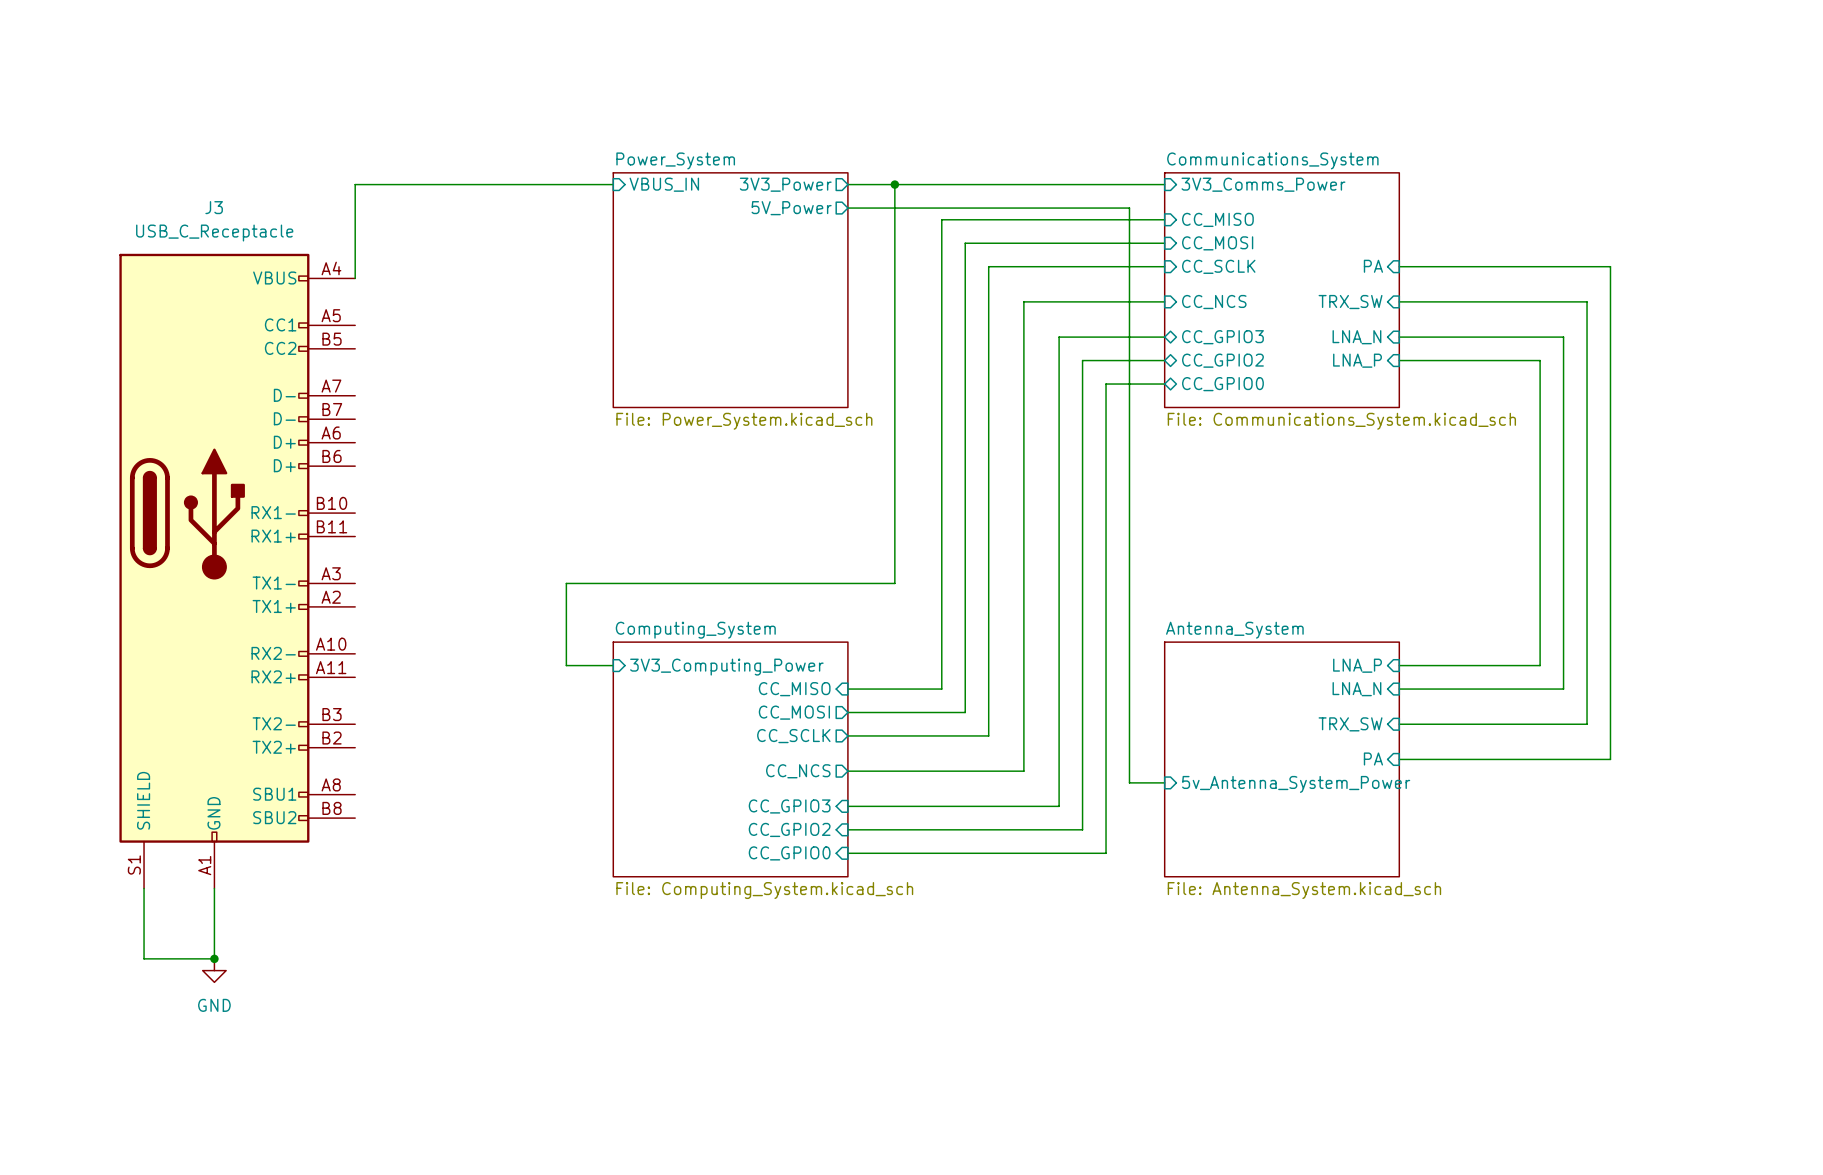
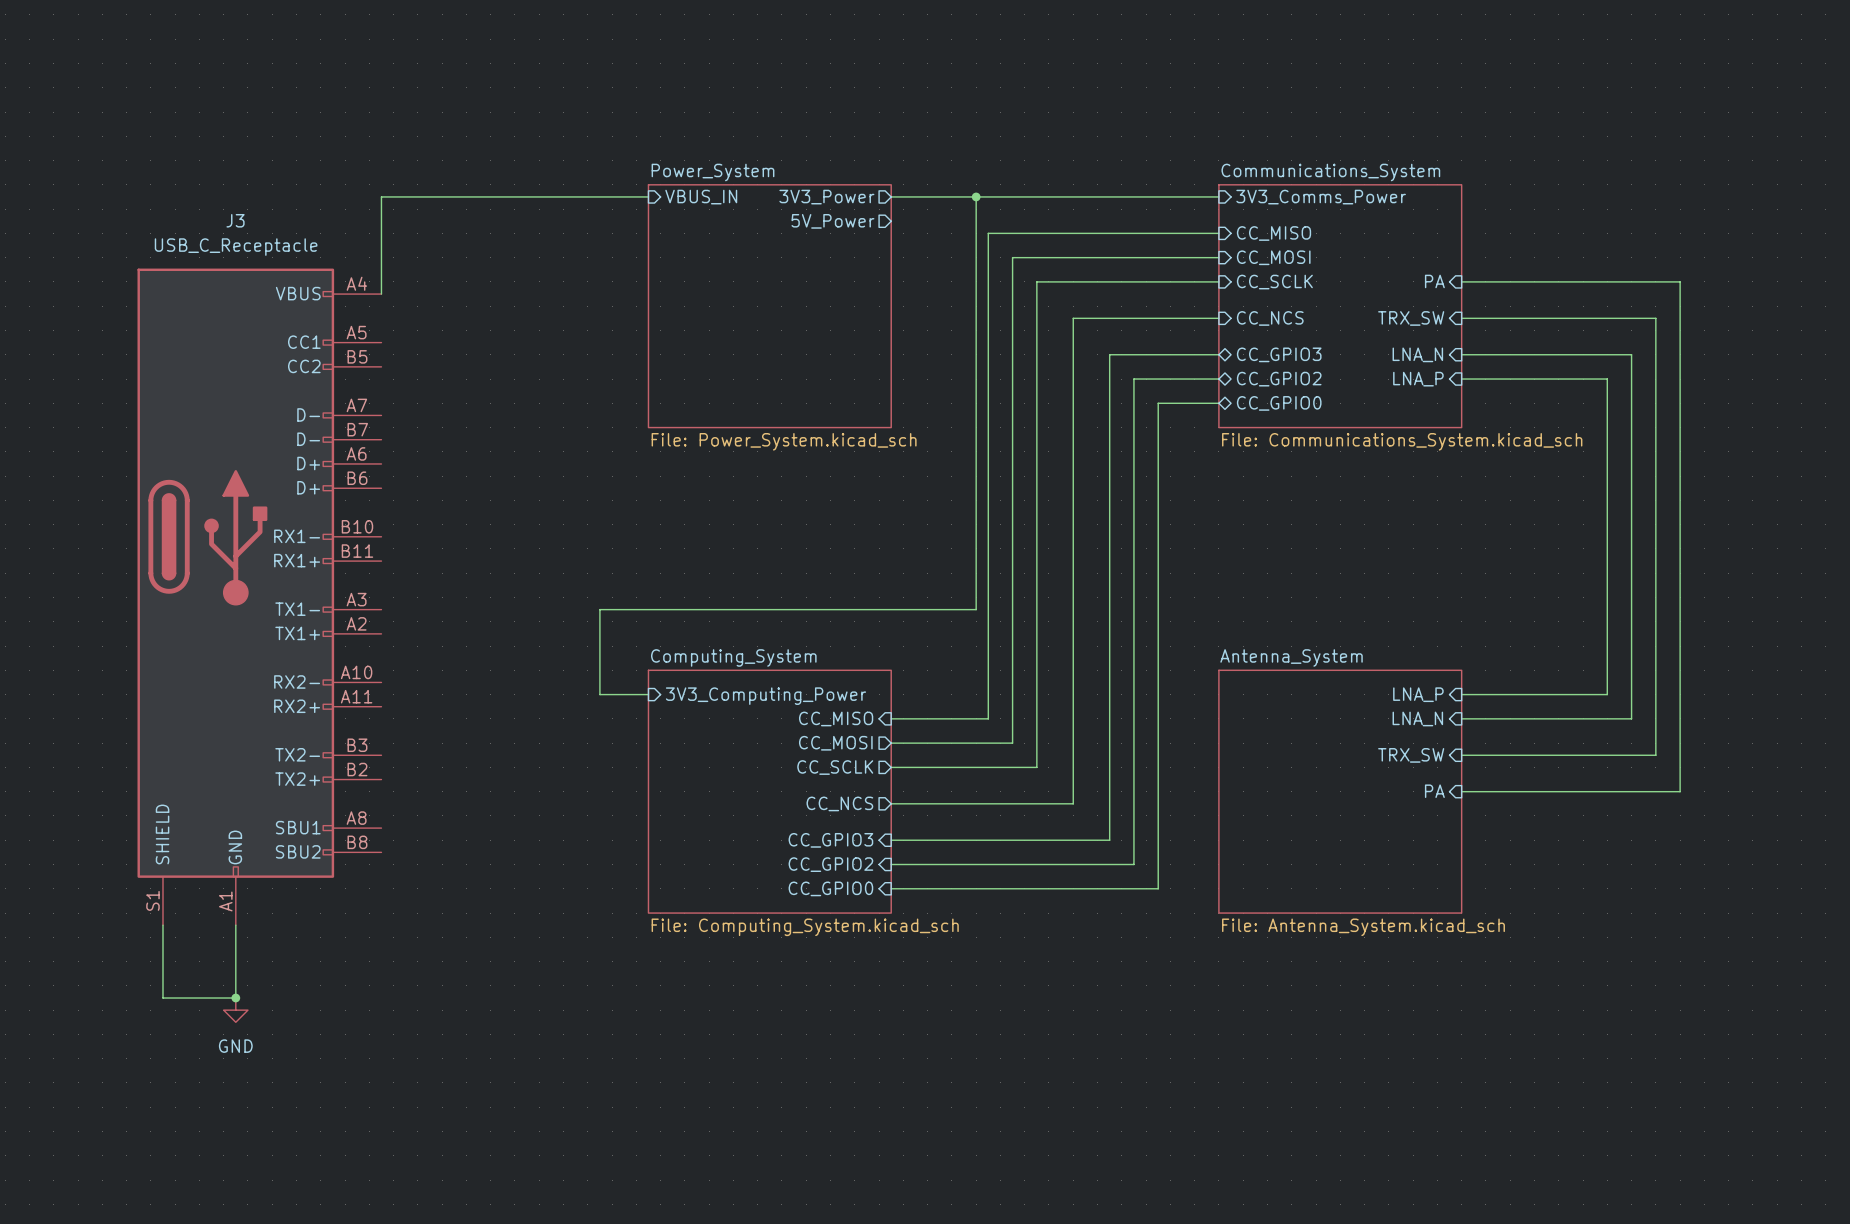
wire: (894, 184) (894, 583) -> (976, 196) (976, 609) (939, 609)
junction position: (894, 184) -> (976, 196)
wire: (847, 208) (1129, 208) (1129, 782) (1164, 782) -> none
sheet pin: 5v_Antenna_System_Power (1296, 784) -> none

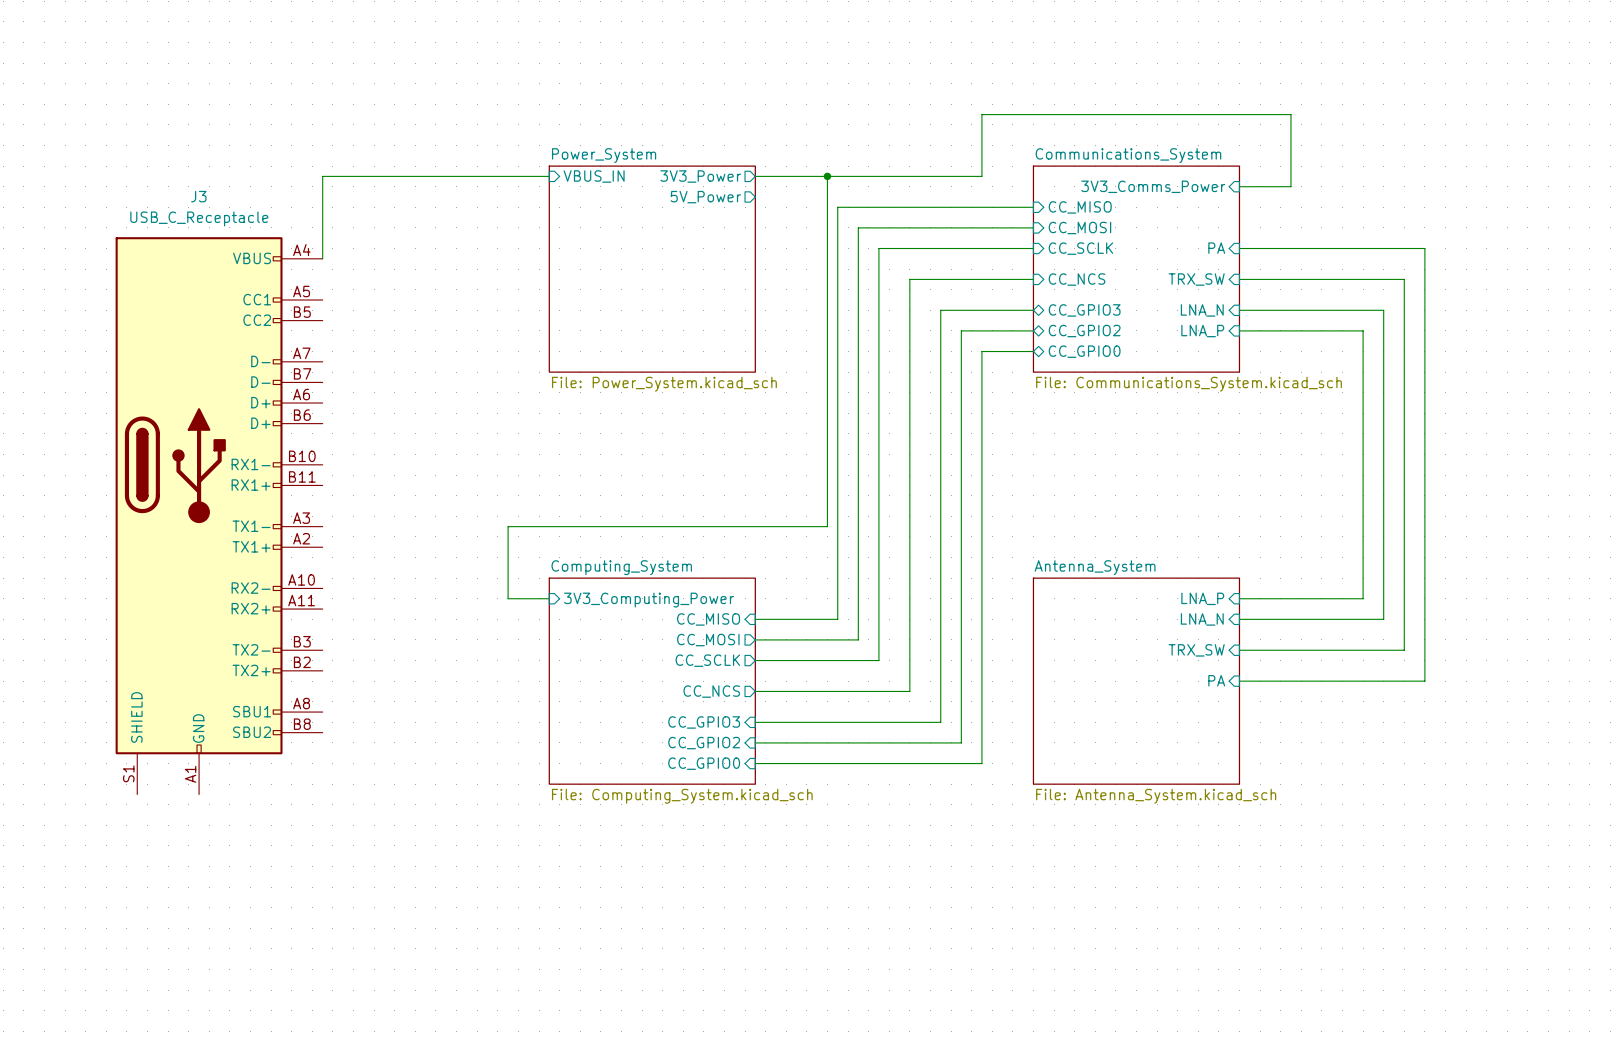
wire: (1158, 196) (1218, 196) -> (981, 176) (981, 114) (1290, 114) (1290, 186) (1239, 186)
sheet pin rotation: 0° (1321, 197) -> 180° (1153, 186)
wire: (162, 925) (162, 998) (235, 998) (235, 925) -> none
junction: (235, 998) -> none
power symbol: GND (235, 1010) -> none

